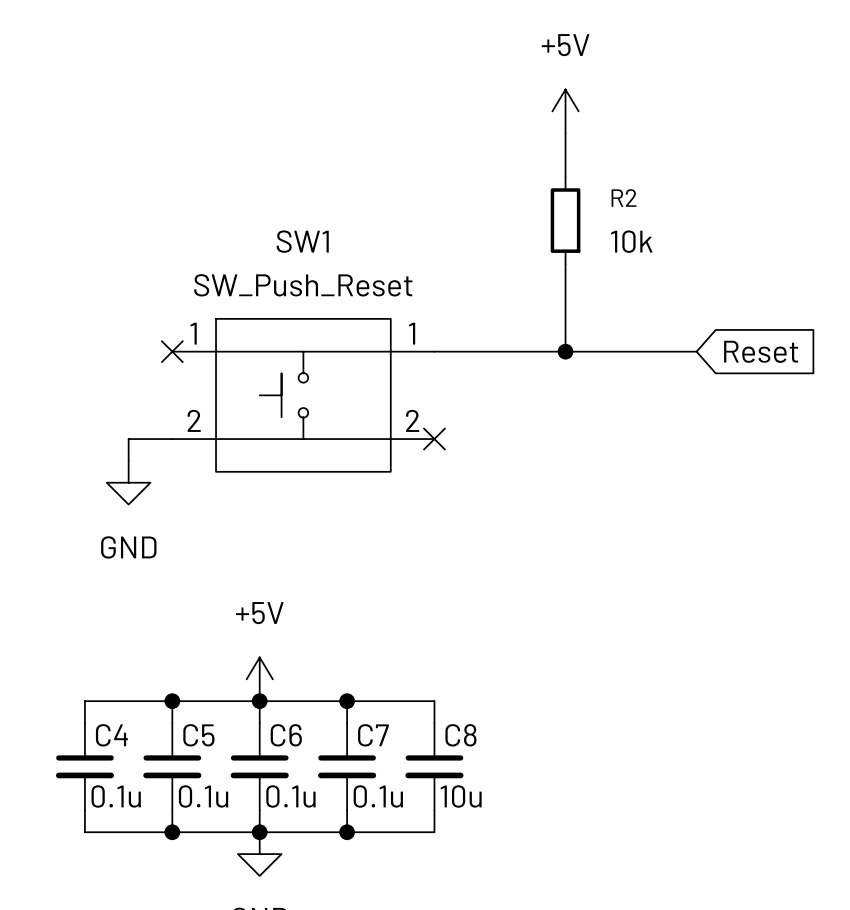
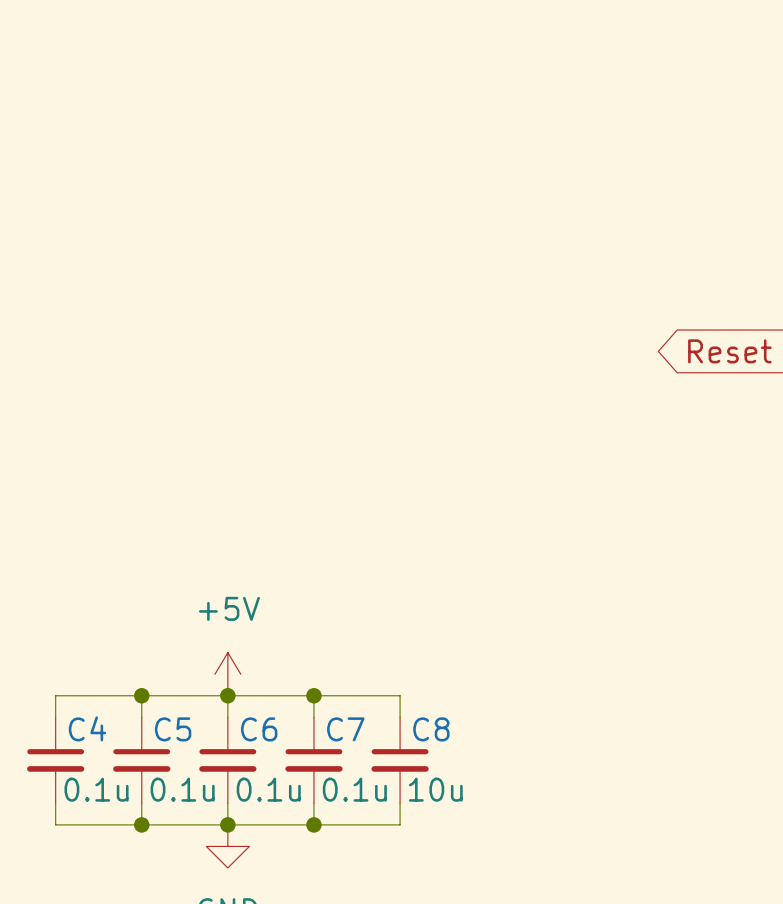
power symbol: +5V (565, 111) -> none
wire: (565, 133) (565, 176) -> none
R2: 10k (565, 220) -> none
wire: (565, 264) (565, 351) -> none
no-connect mark: (172, 351) -> none
wire: (434, 351) (696, 351) -> none
junction: (565, 351) -> none
SW1: SW_Push_Reset (303, 395) -> none
wire: (172, 439) (128, 439) (128, 460) -> none
no-connect mark: (434, 439) -> none
power symbol: GND (128, 482) -> none

